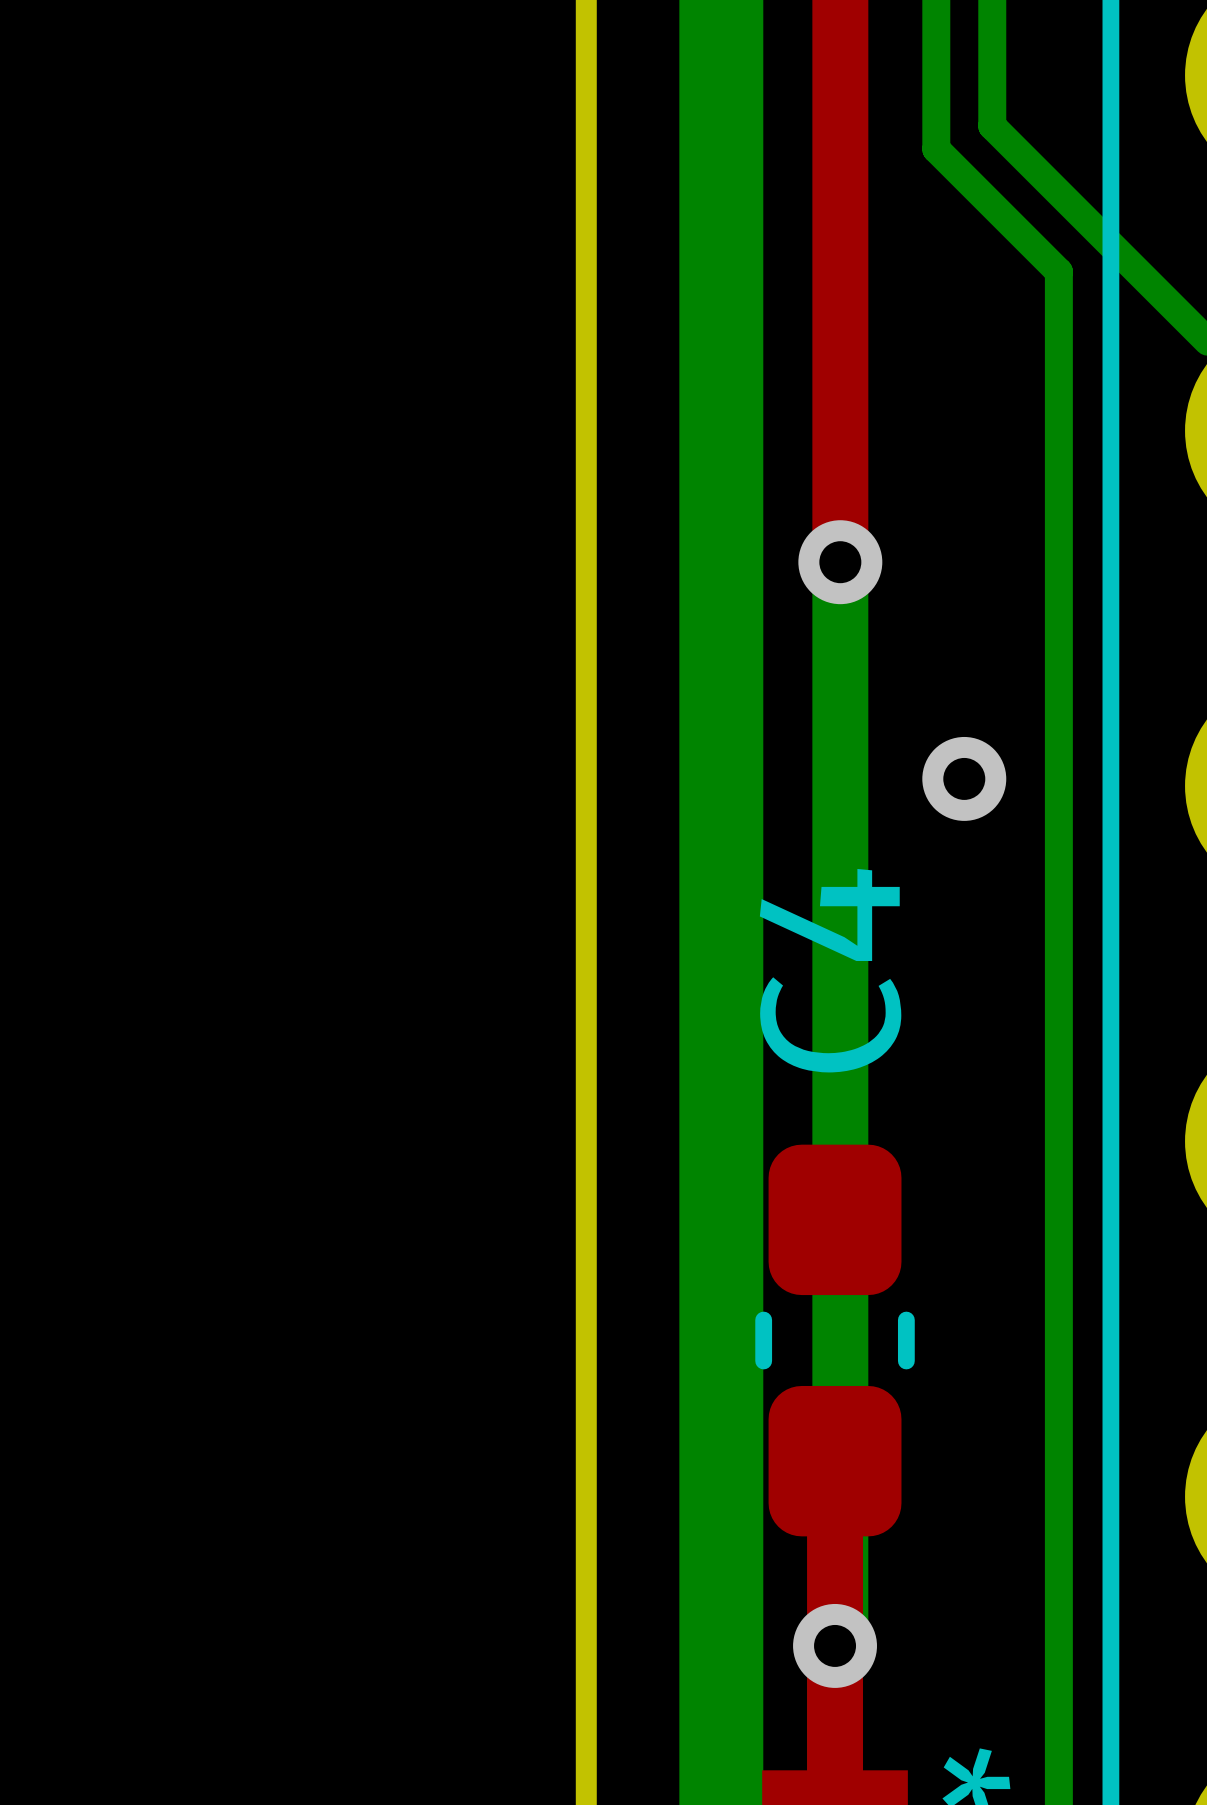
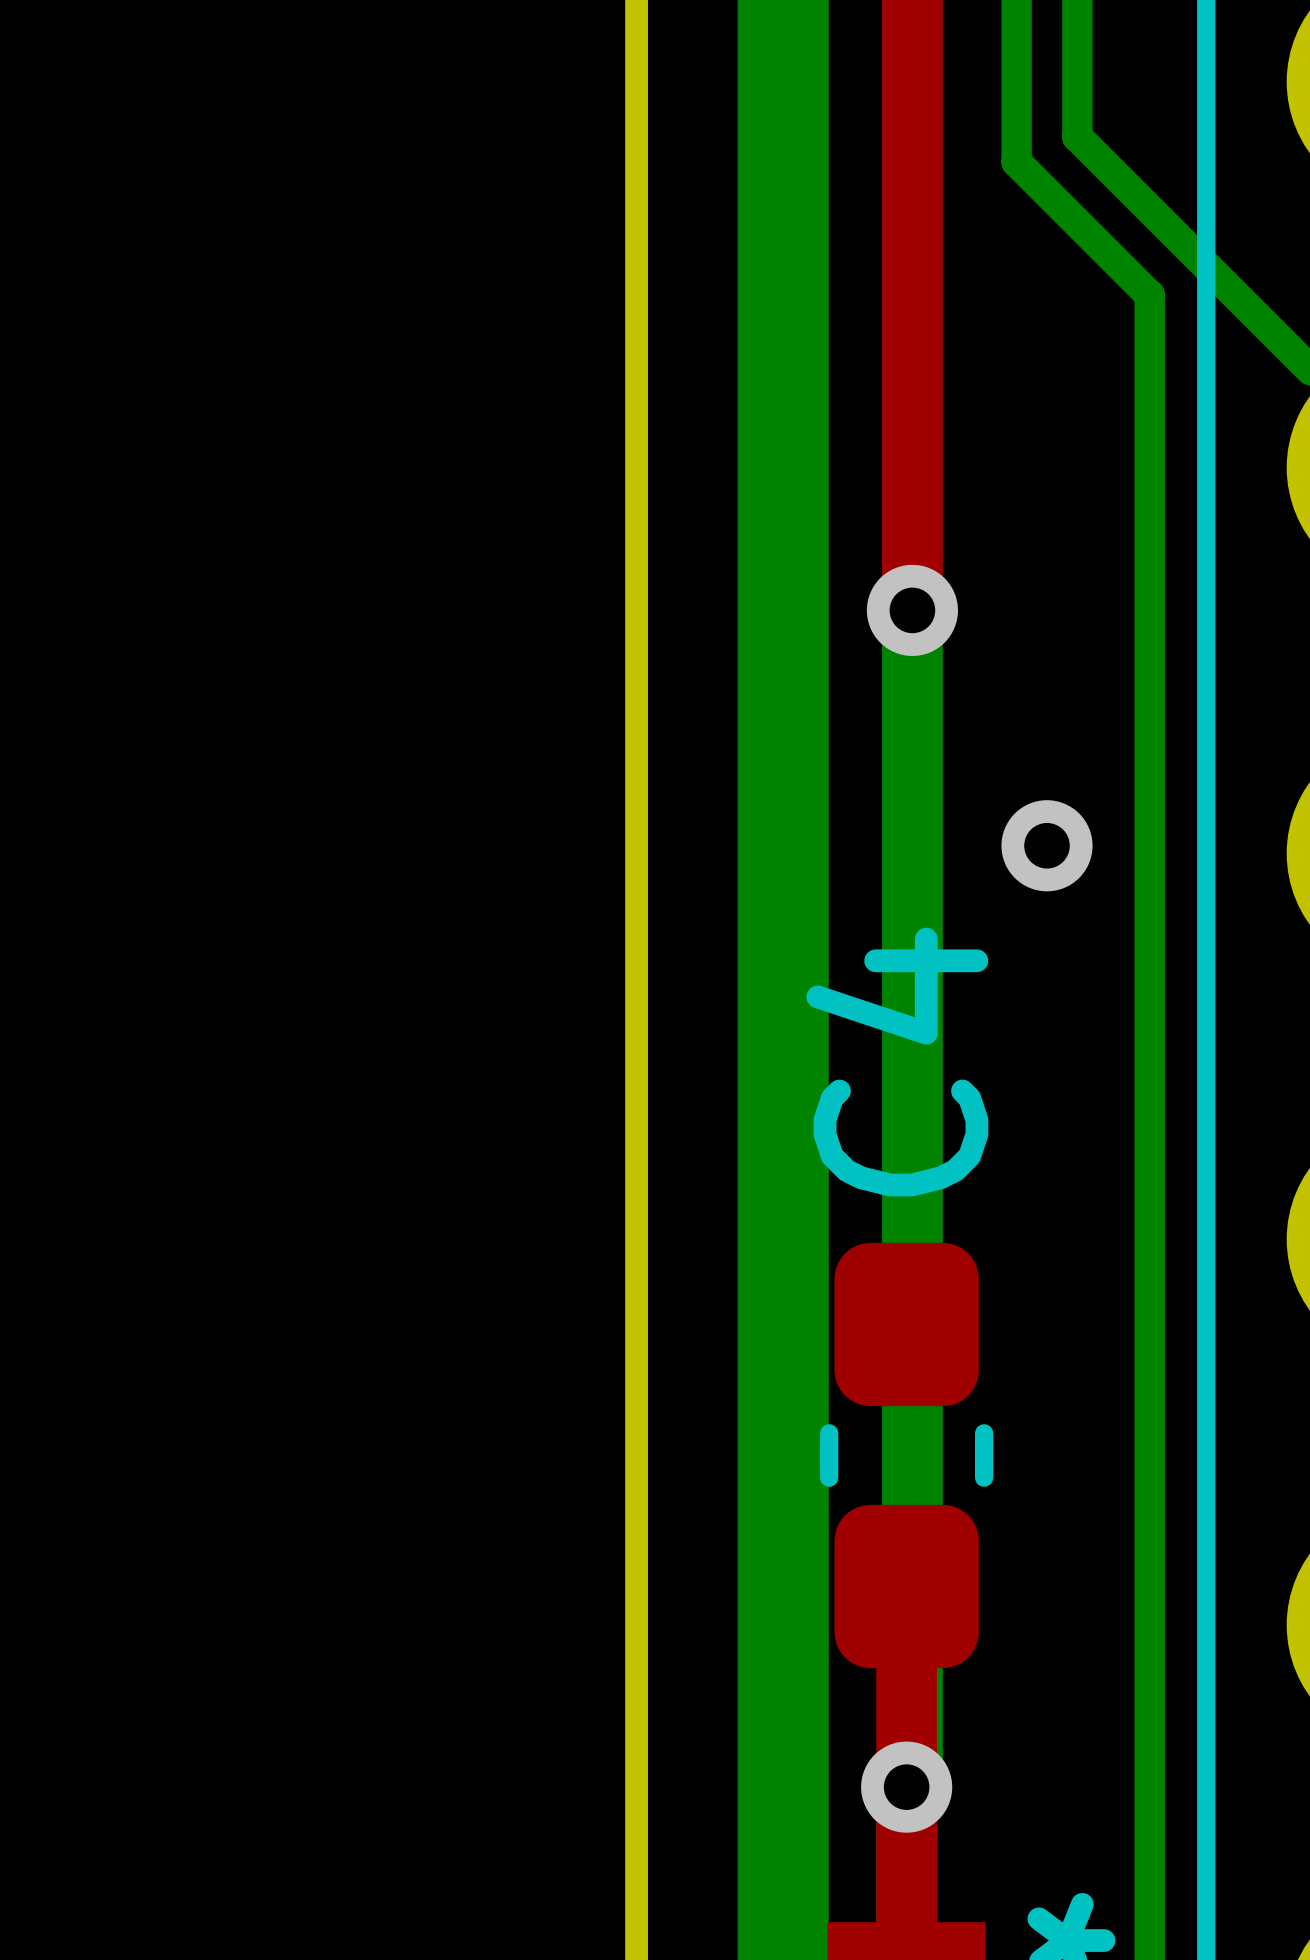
C4 name position: C4 (830, 970) -> C4 (897, 1062)

